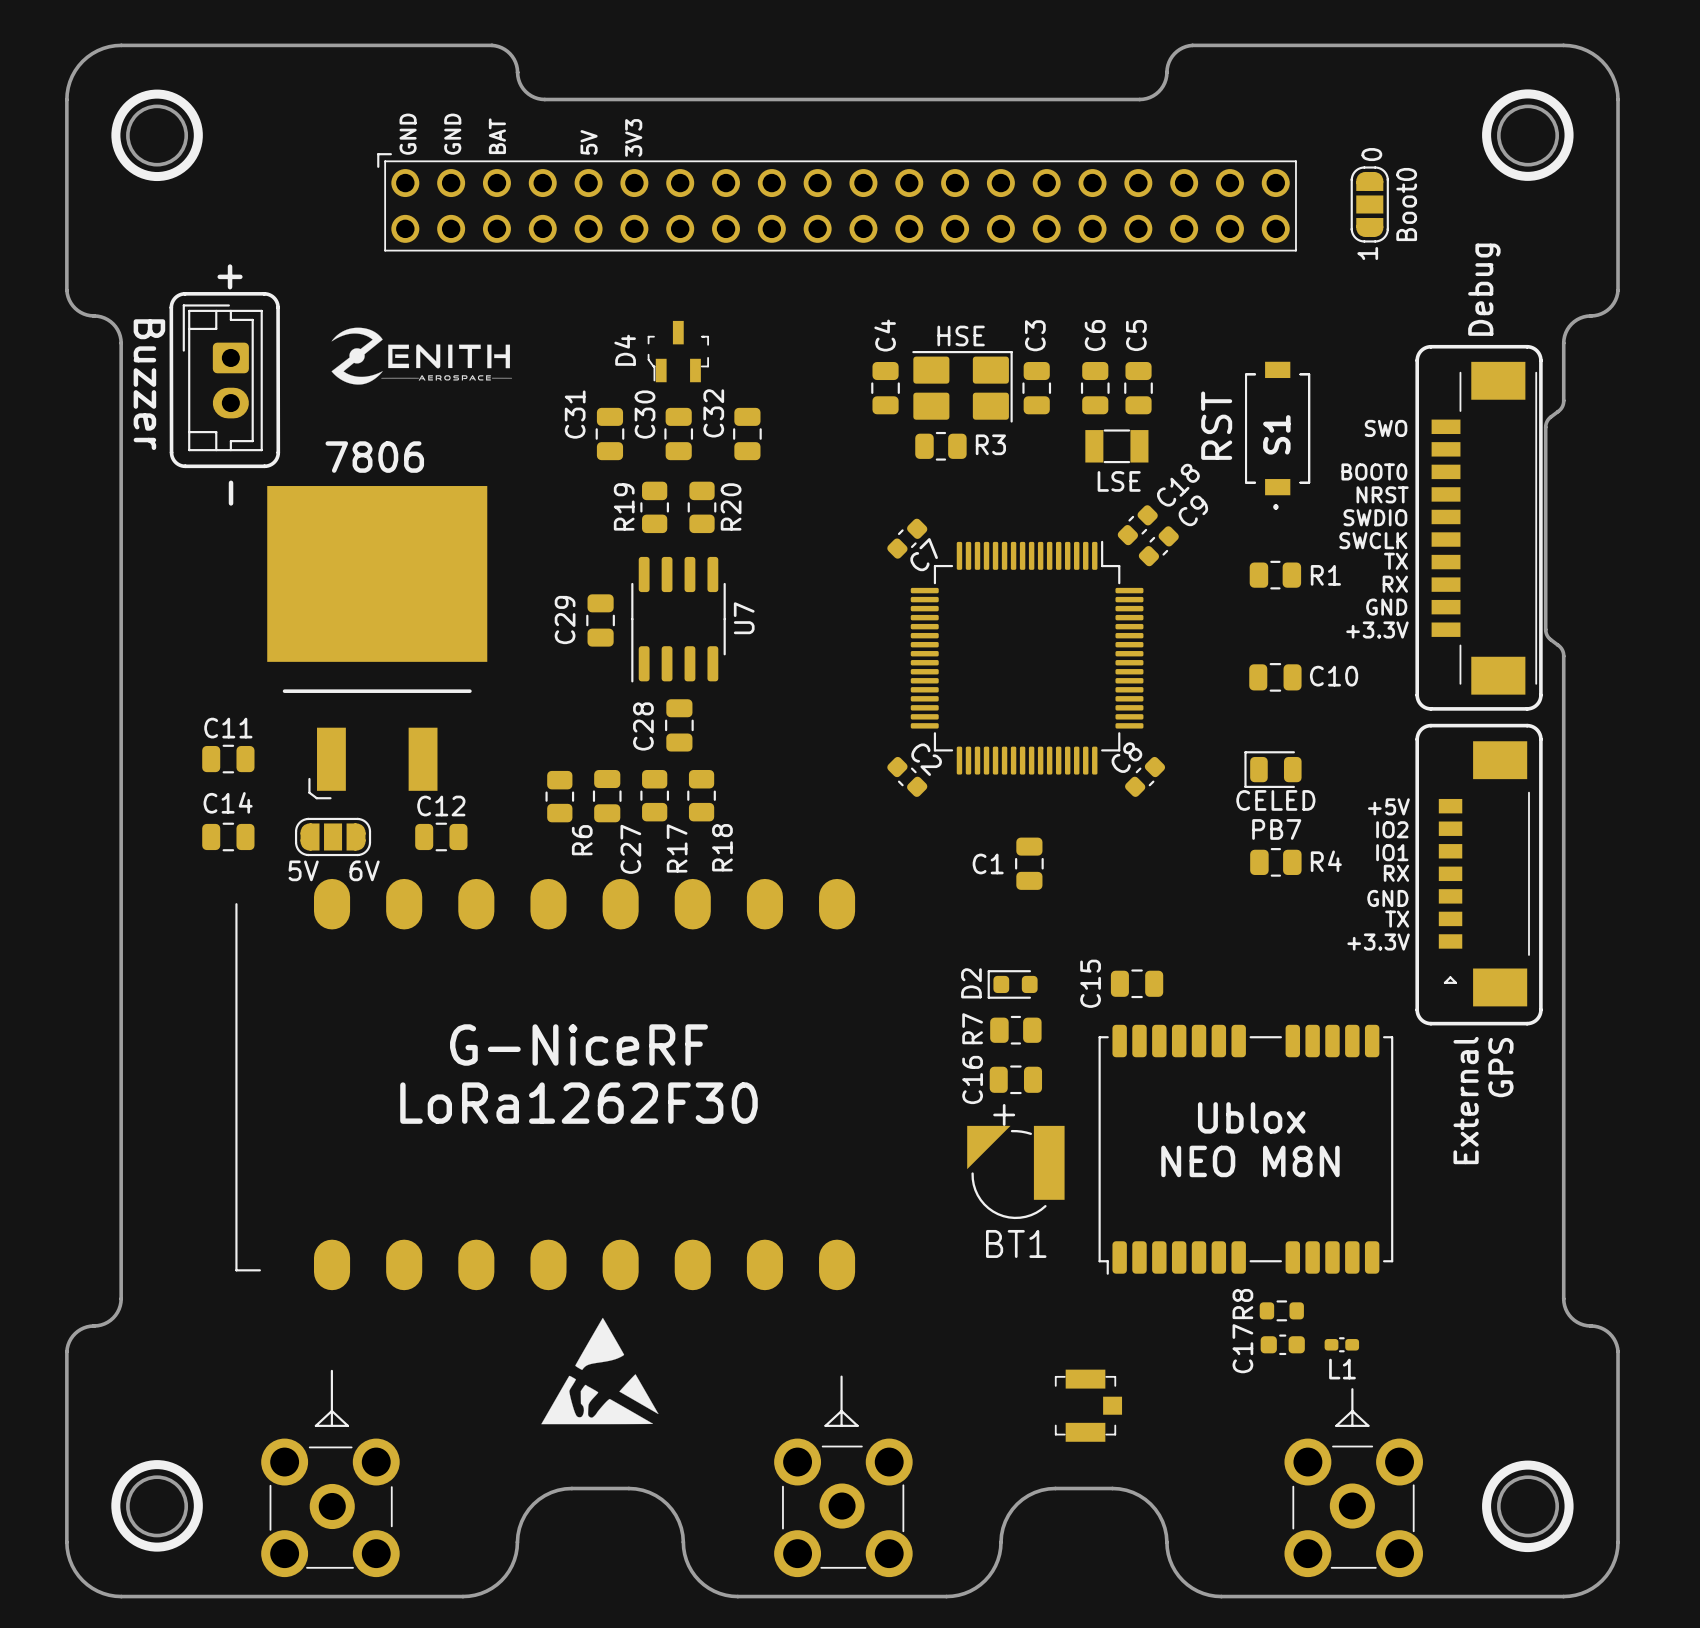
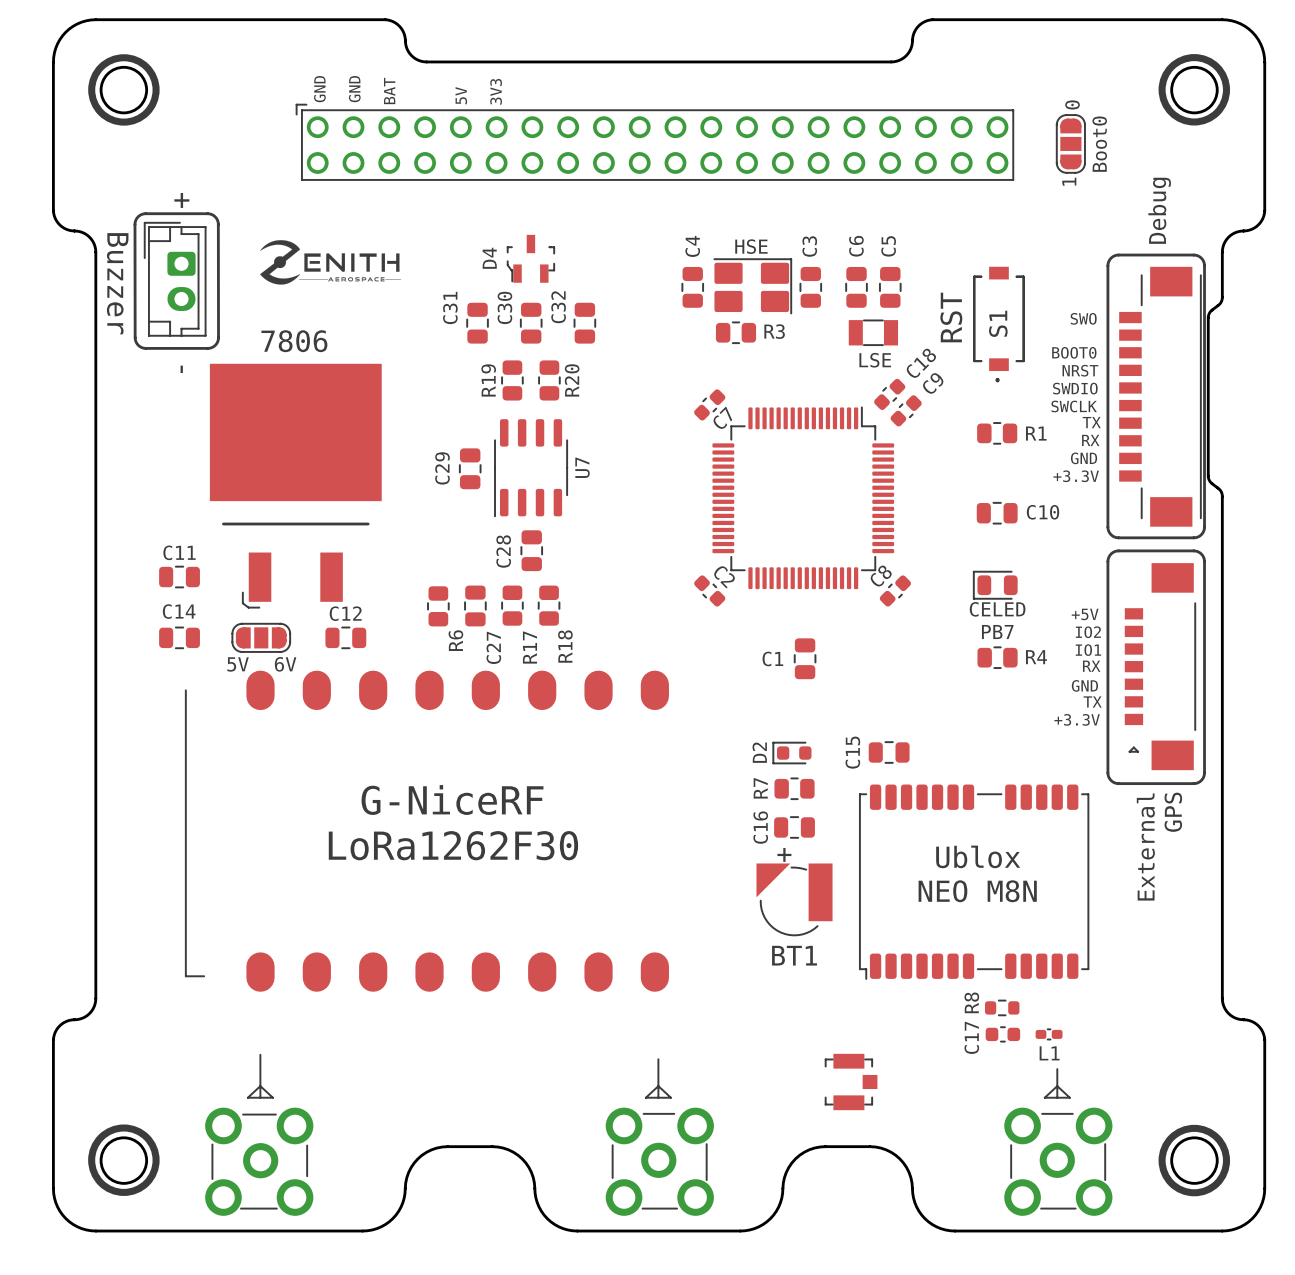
drawing: [541, 1317, 659, 1425] -> none

